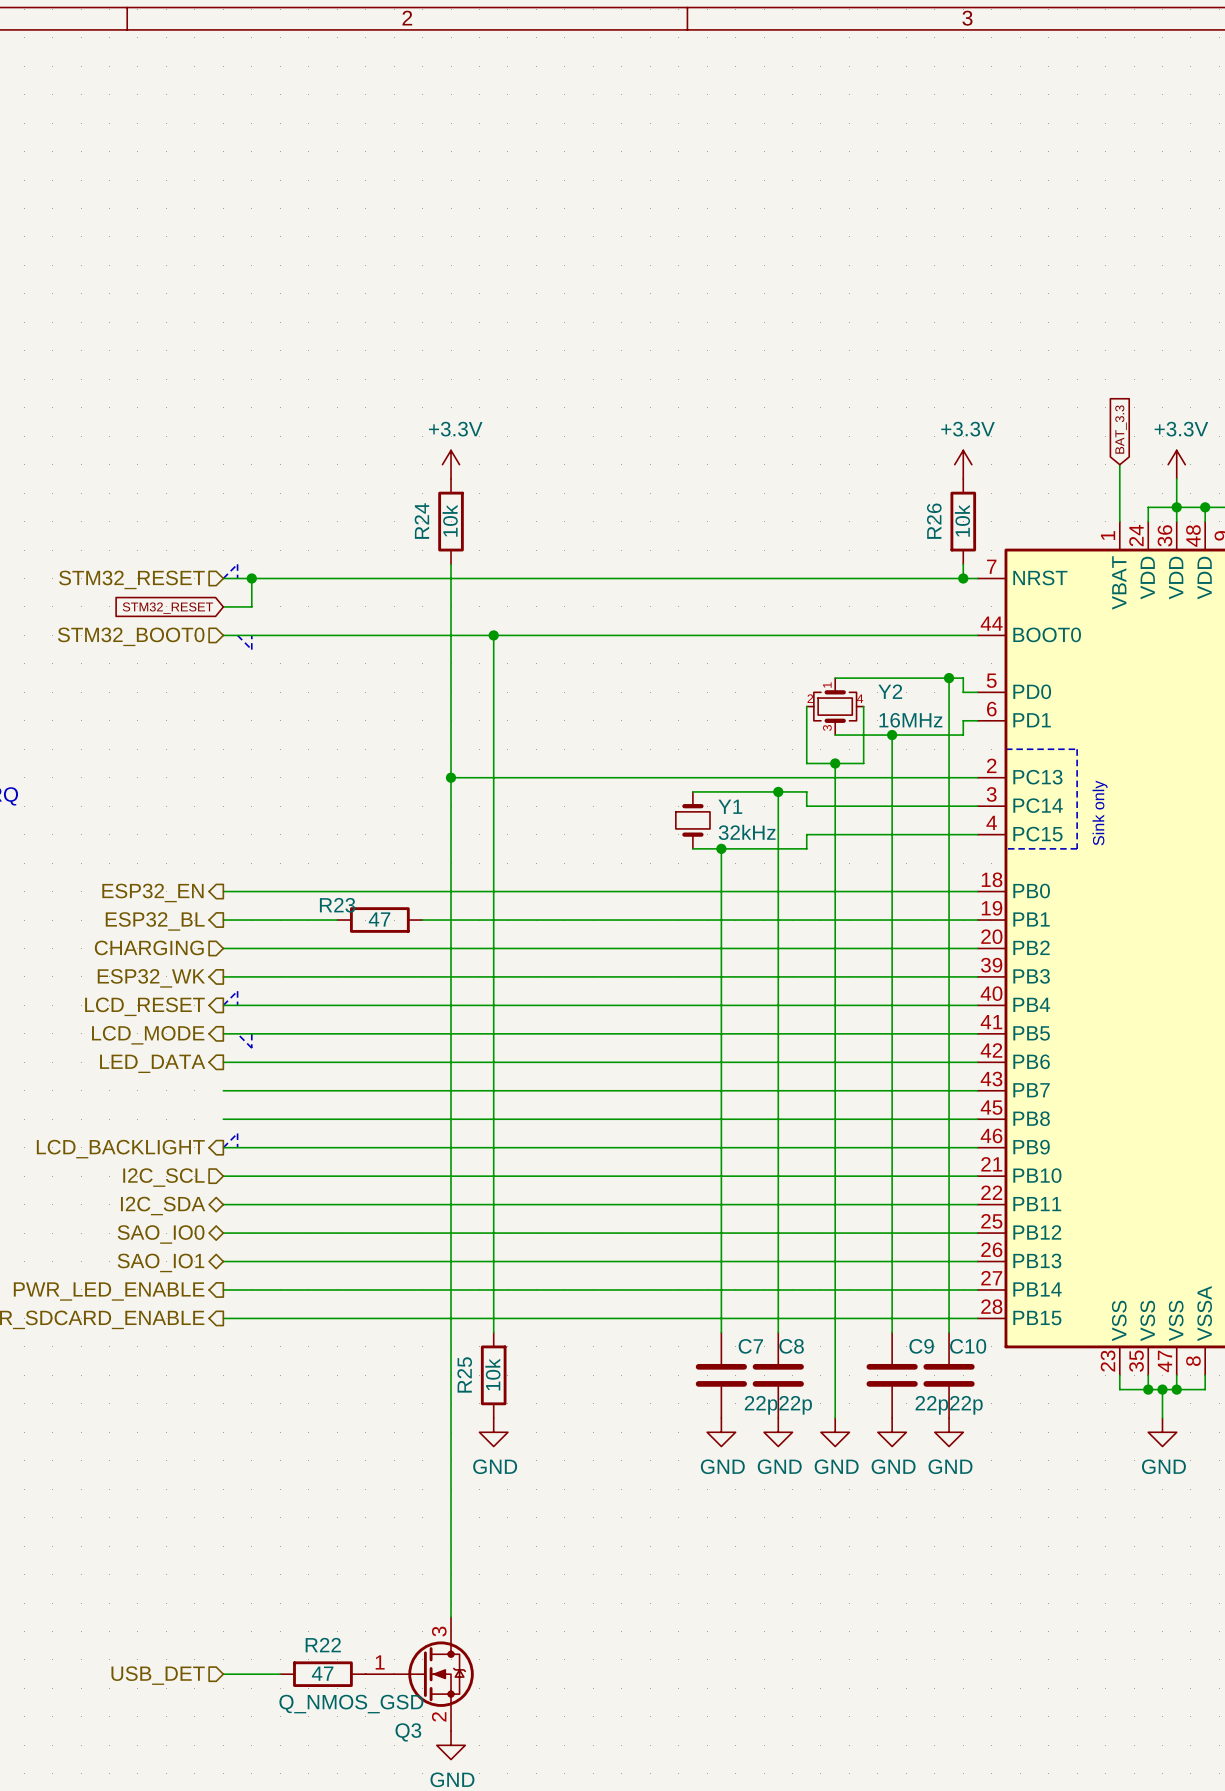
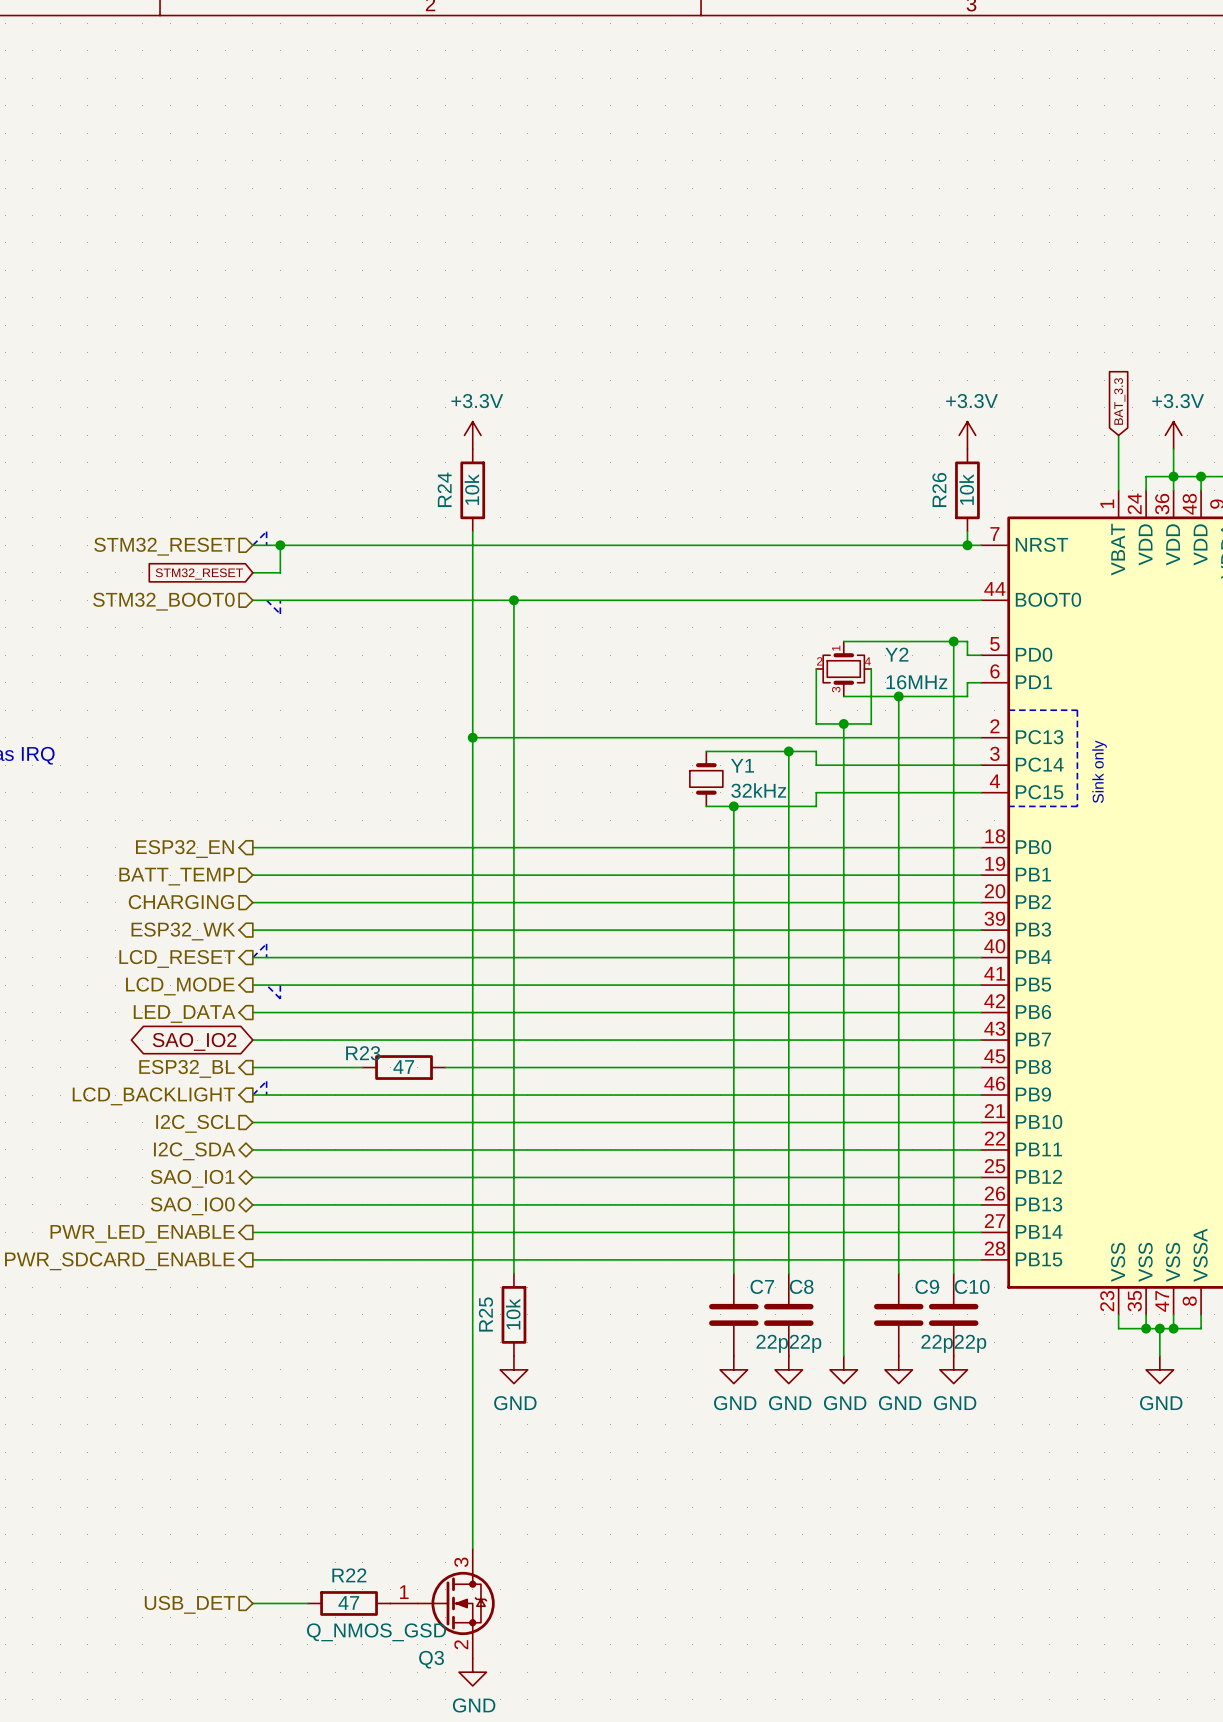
R23 position: (379, 920) -> (404, 1067)
hierarchical label shape: output (155, 921) -> input (176, 876)
hierarchical label: ESP32_BL (155, 921) -> BATT_TEMP (176, 876)
global label: none -> SAO_IO2 (194, 1041)
wire: (337, 1119) (422, 1119) -> (362, 875) (445, 875)
hierarchical label: none -> ESP32_BL (187, 1068)
hierarchical label: SAO_IO0 (161, 1234) -> SAO_IO1 (192, 1178)
hierarchical label: SAO_IO1 (160, 1262) -> SAO_IO0 (192, 1206)

